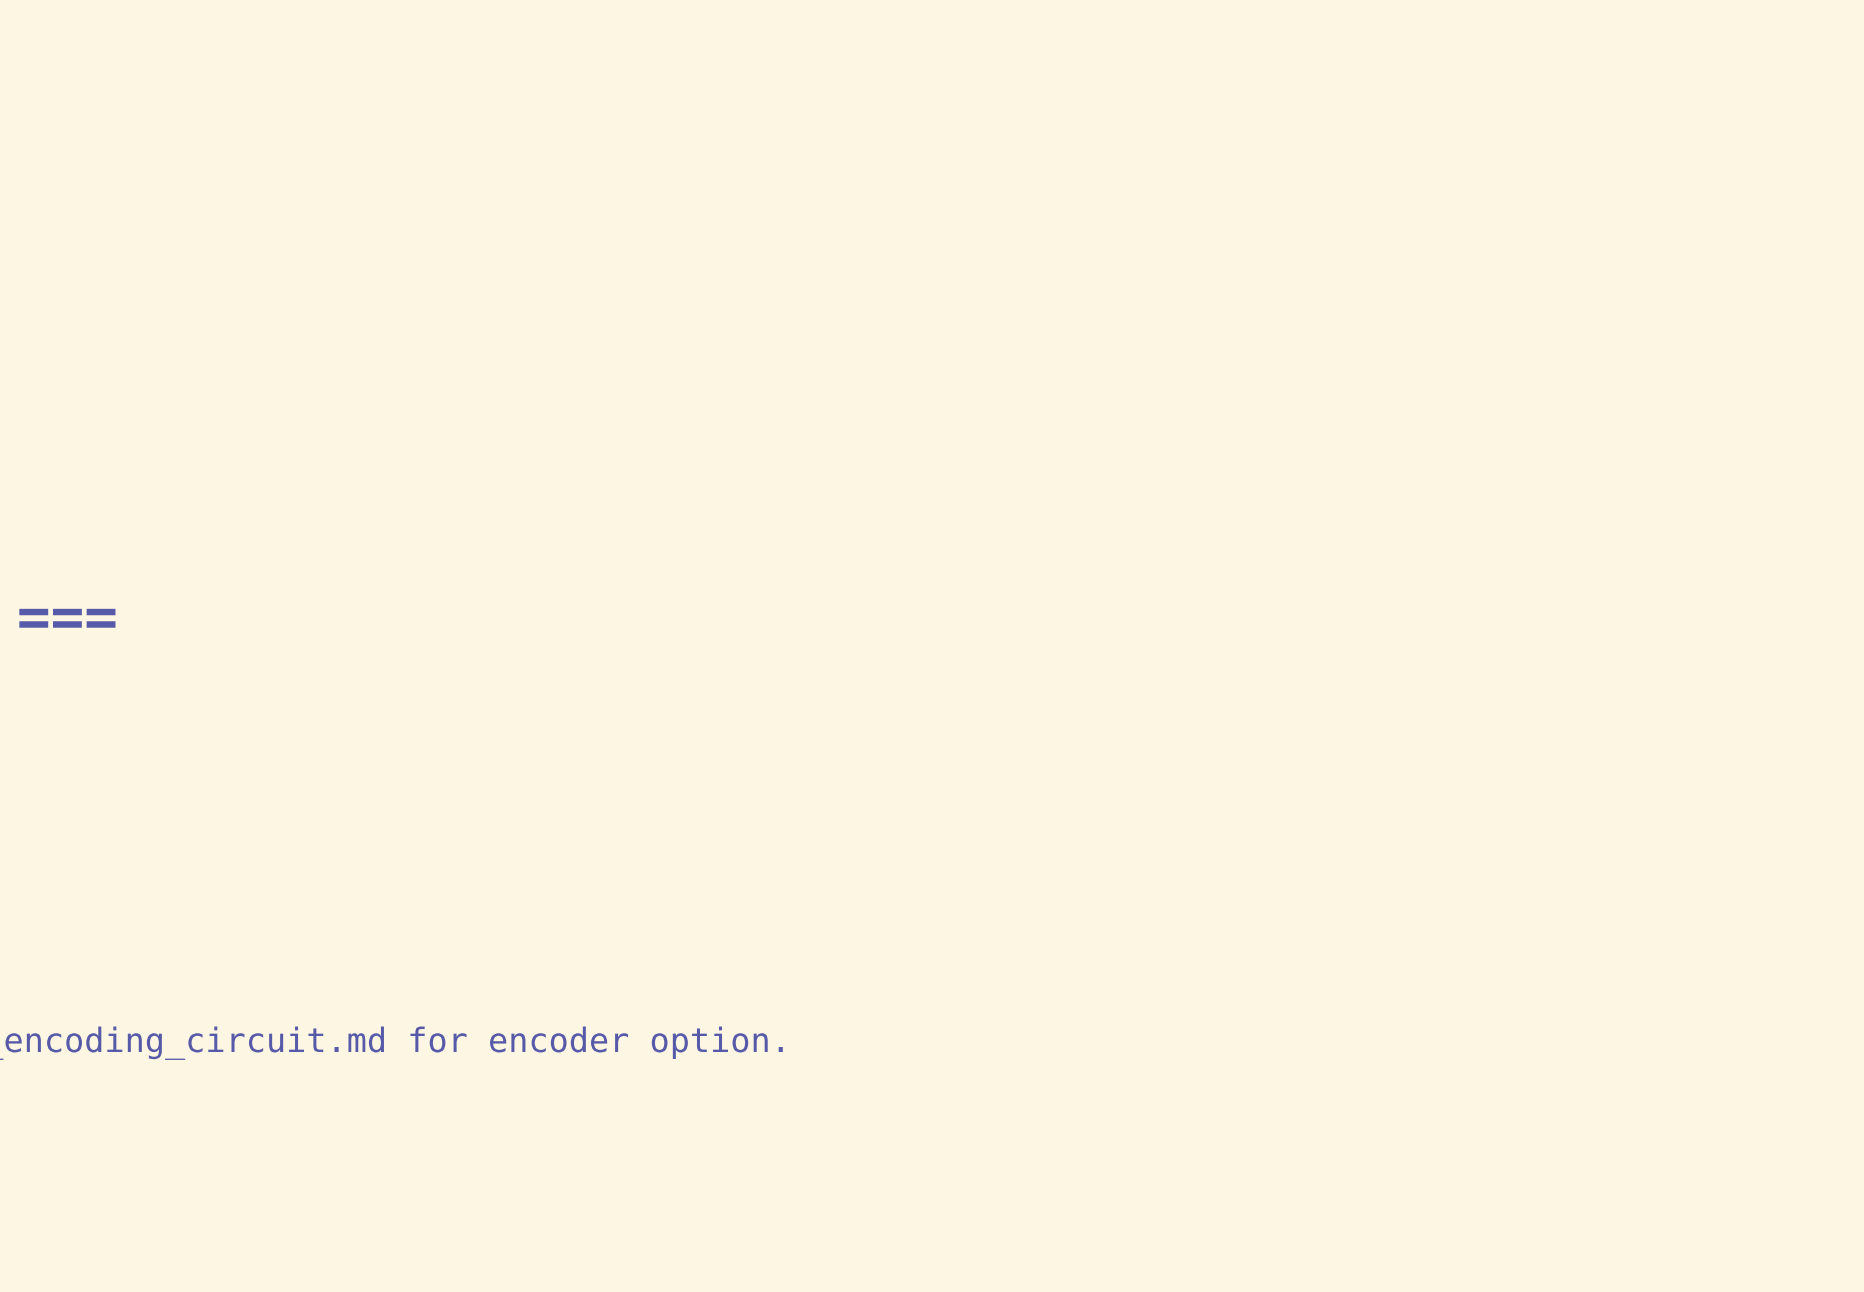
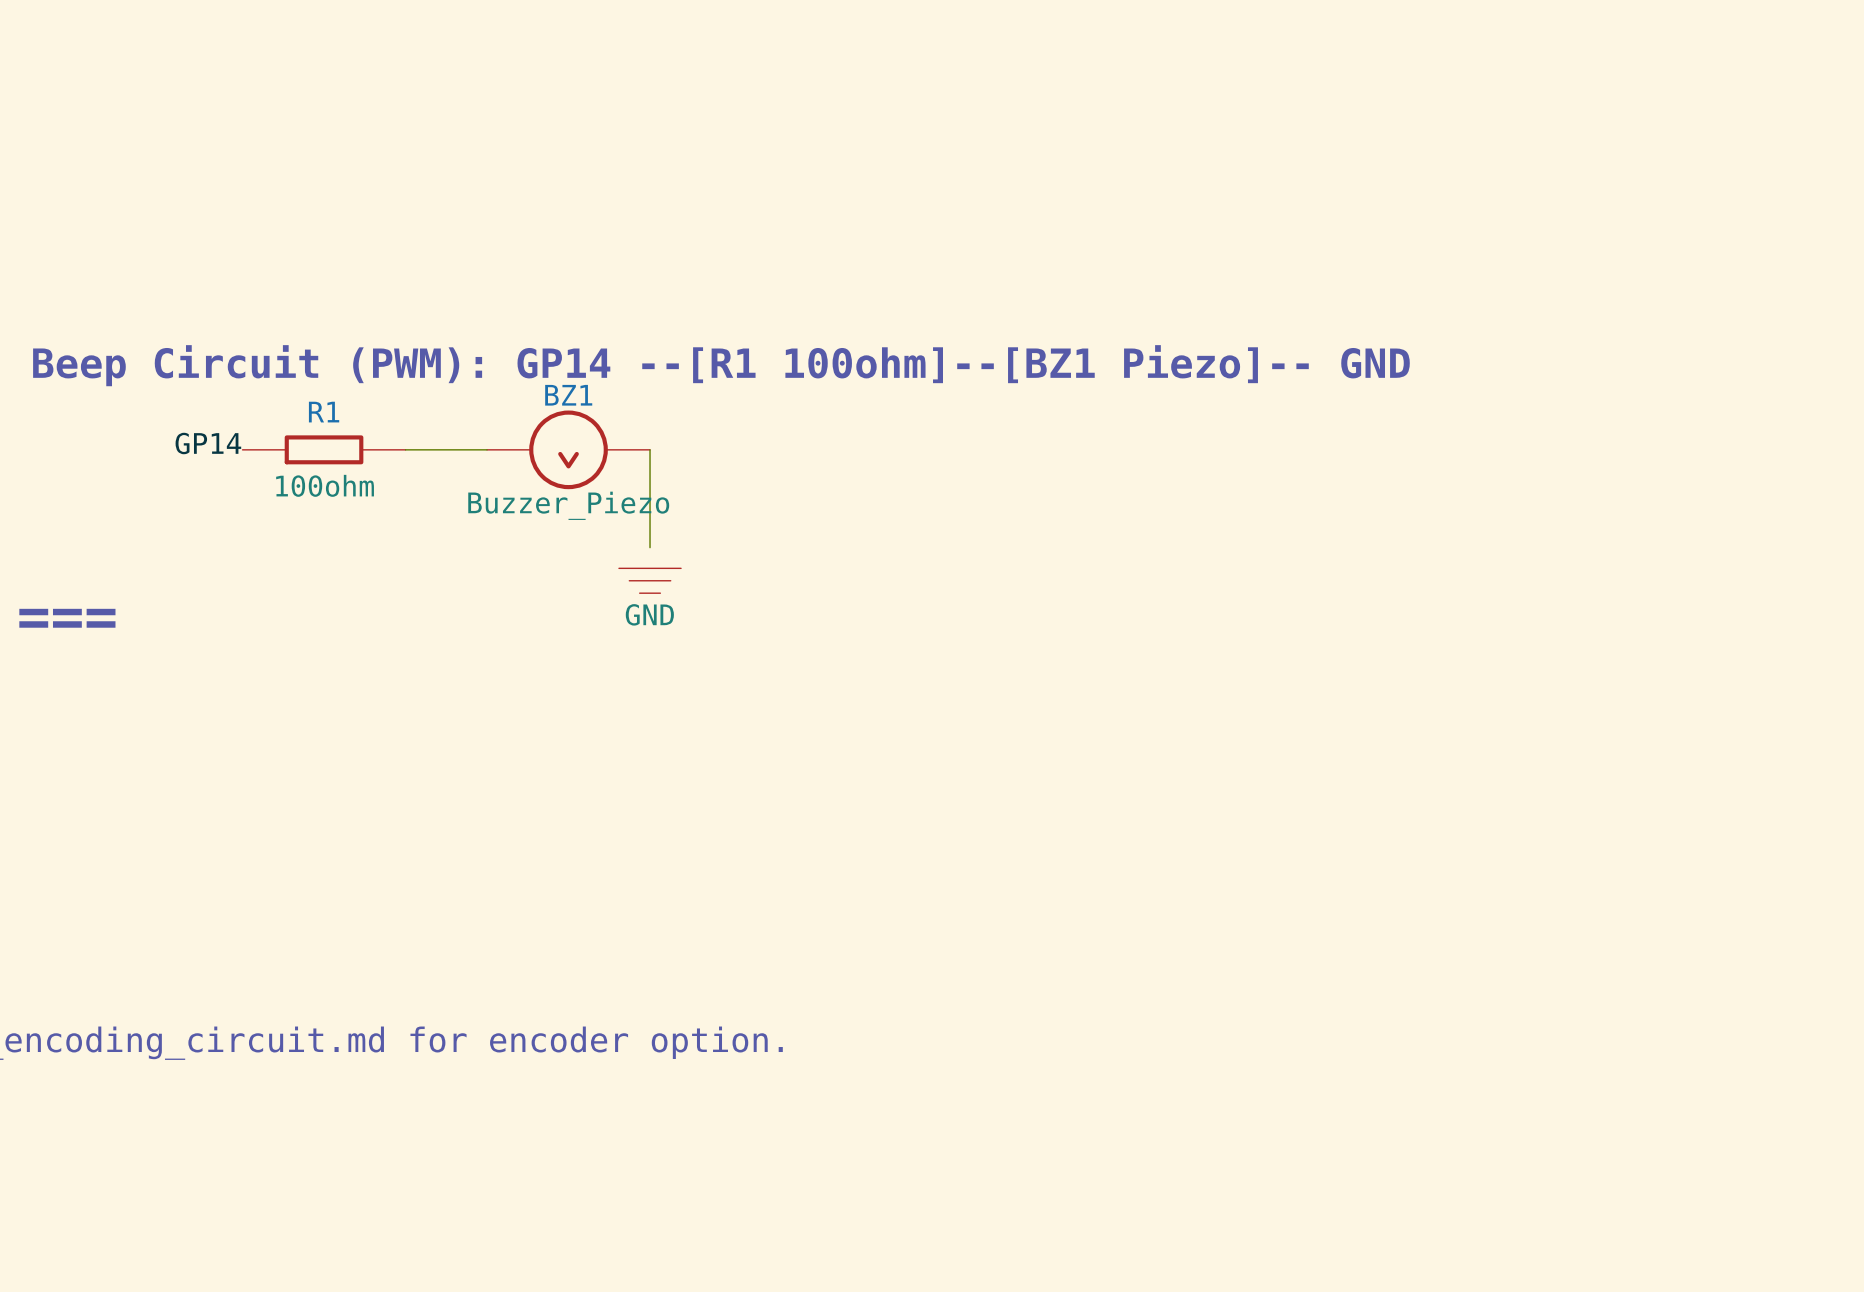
text: none -> Beep Circuit (PWM): GP14 --[R1 100ohm]--[BZ1 Piezo]-- GND (721, 365)
label: none -> GP14 (208, 443)
R1: none -> 100ohm (324, 449)
wire: none -> (405, 449) (487, 449)
BZ1: none -> Buzzer_Piezo (568, 449)
wire: none -> (650, 449) (650, 547)
power symbol: none -> GND (650, 580)

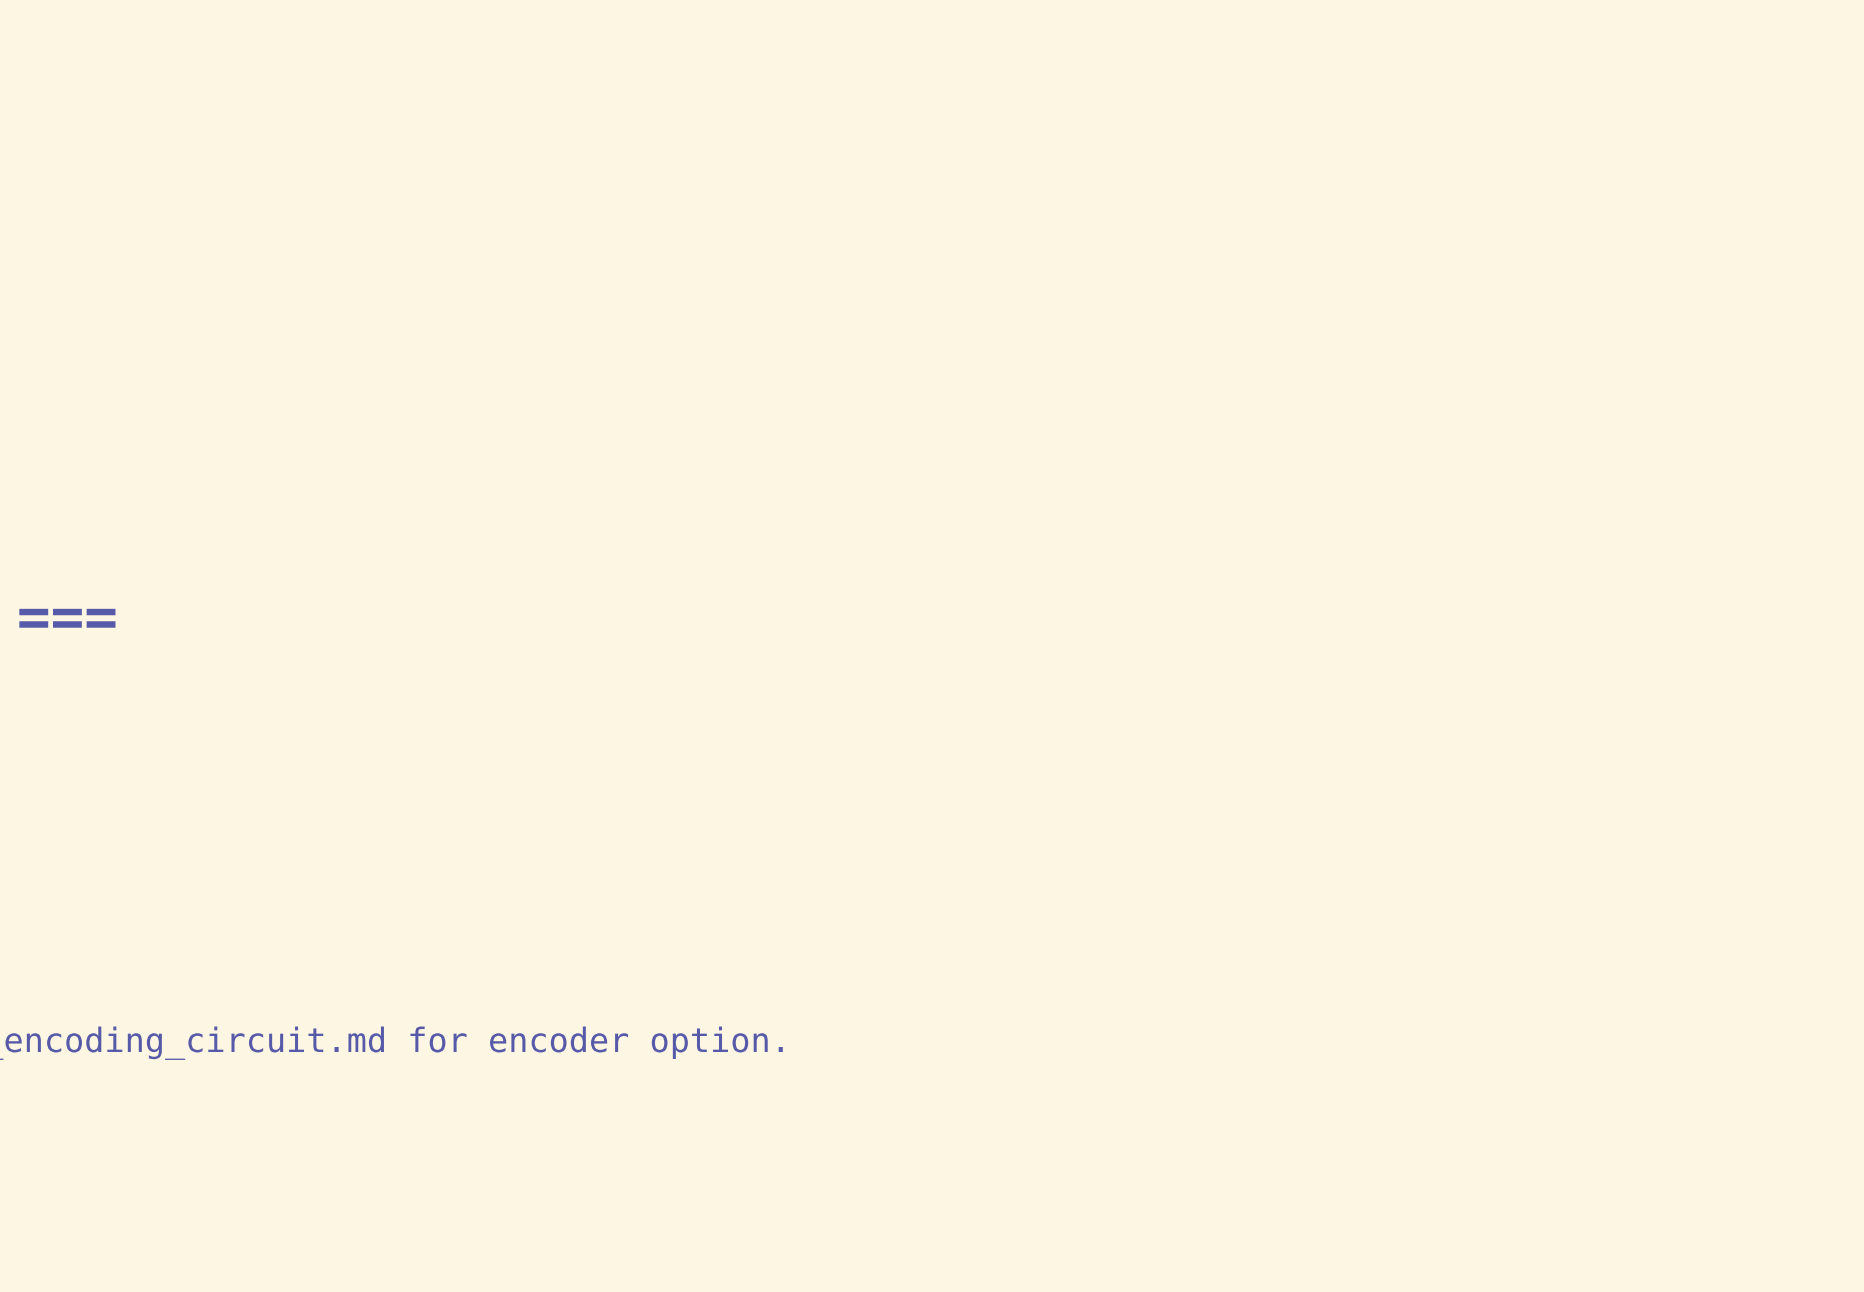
text: Beep Circuit (PWM): GP14 --[R1 100ohm]--[BZ1 Piezo]-- GND (721, 365) -> none
label: GP14 (208, 443) -> none
R1: 100ohm (324, 449) -> none
wire: (405, 449) (487, 449) -> none
BZ1: Buzzer_Piezo (568, 449) -> none
wire: (650, 449) (650, 547) -> none
power symbol: GND (650, 580) -> none

